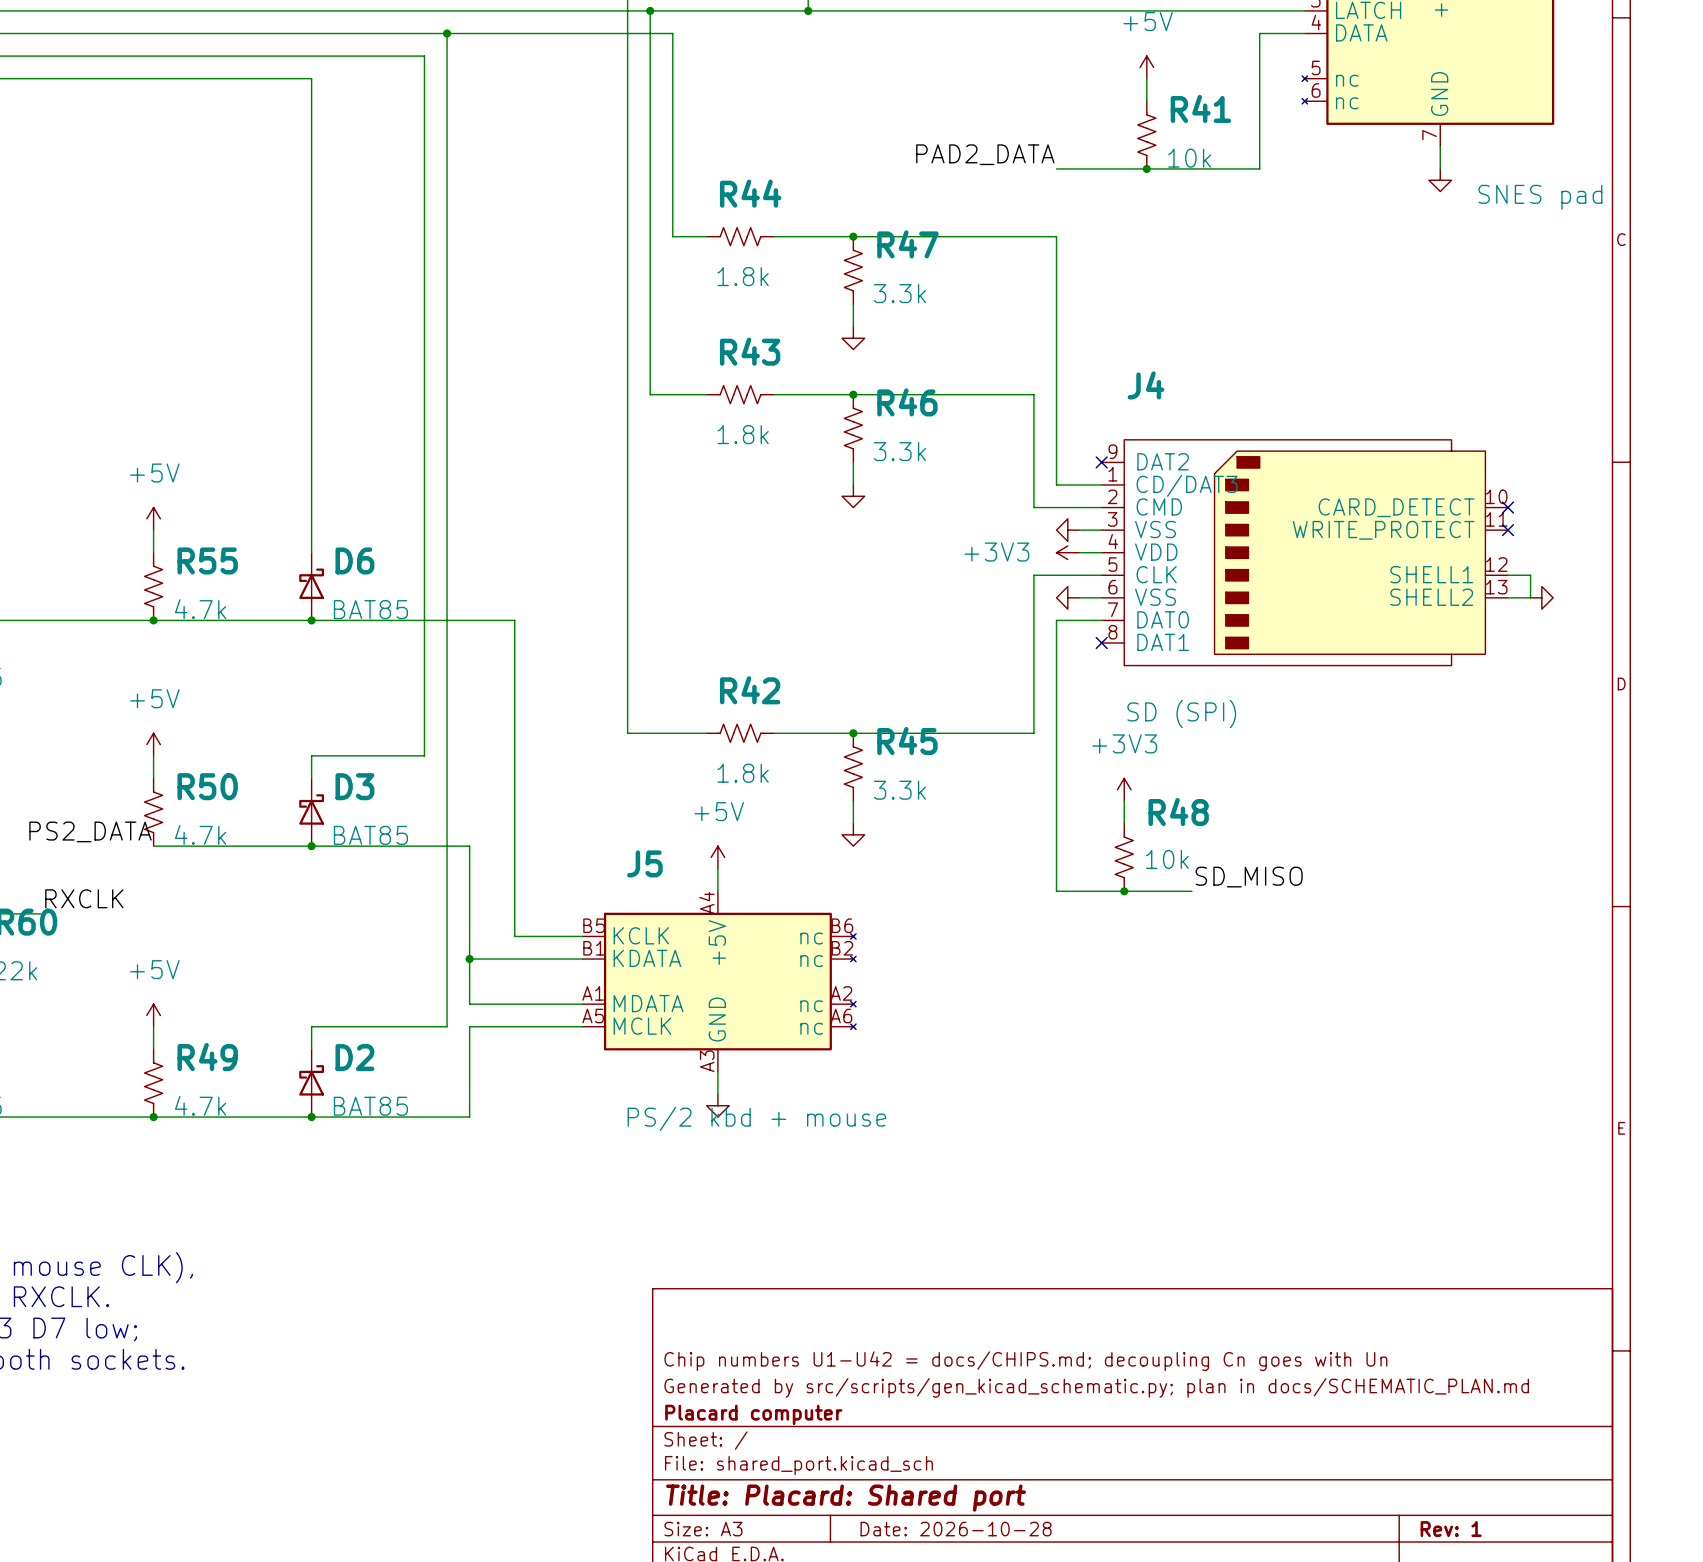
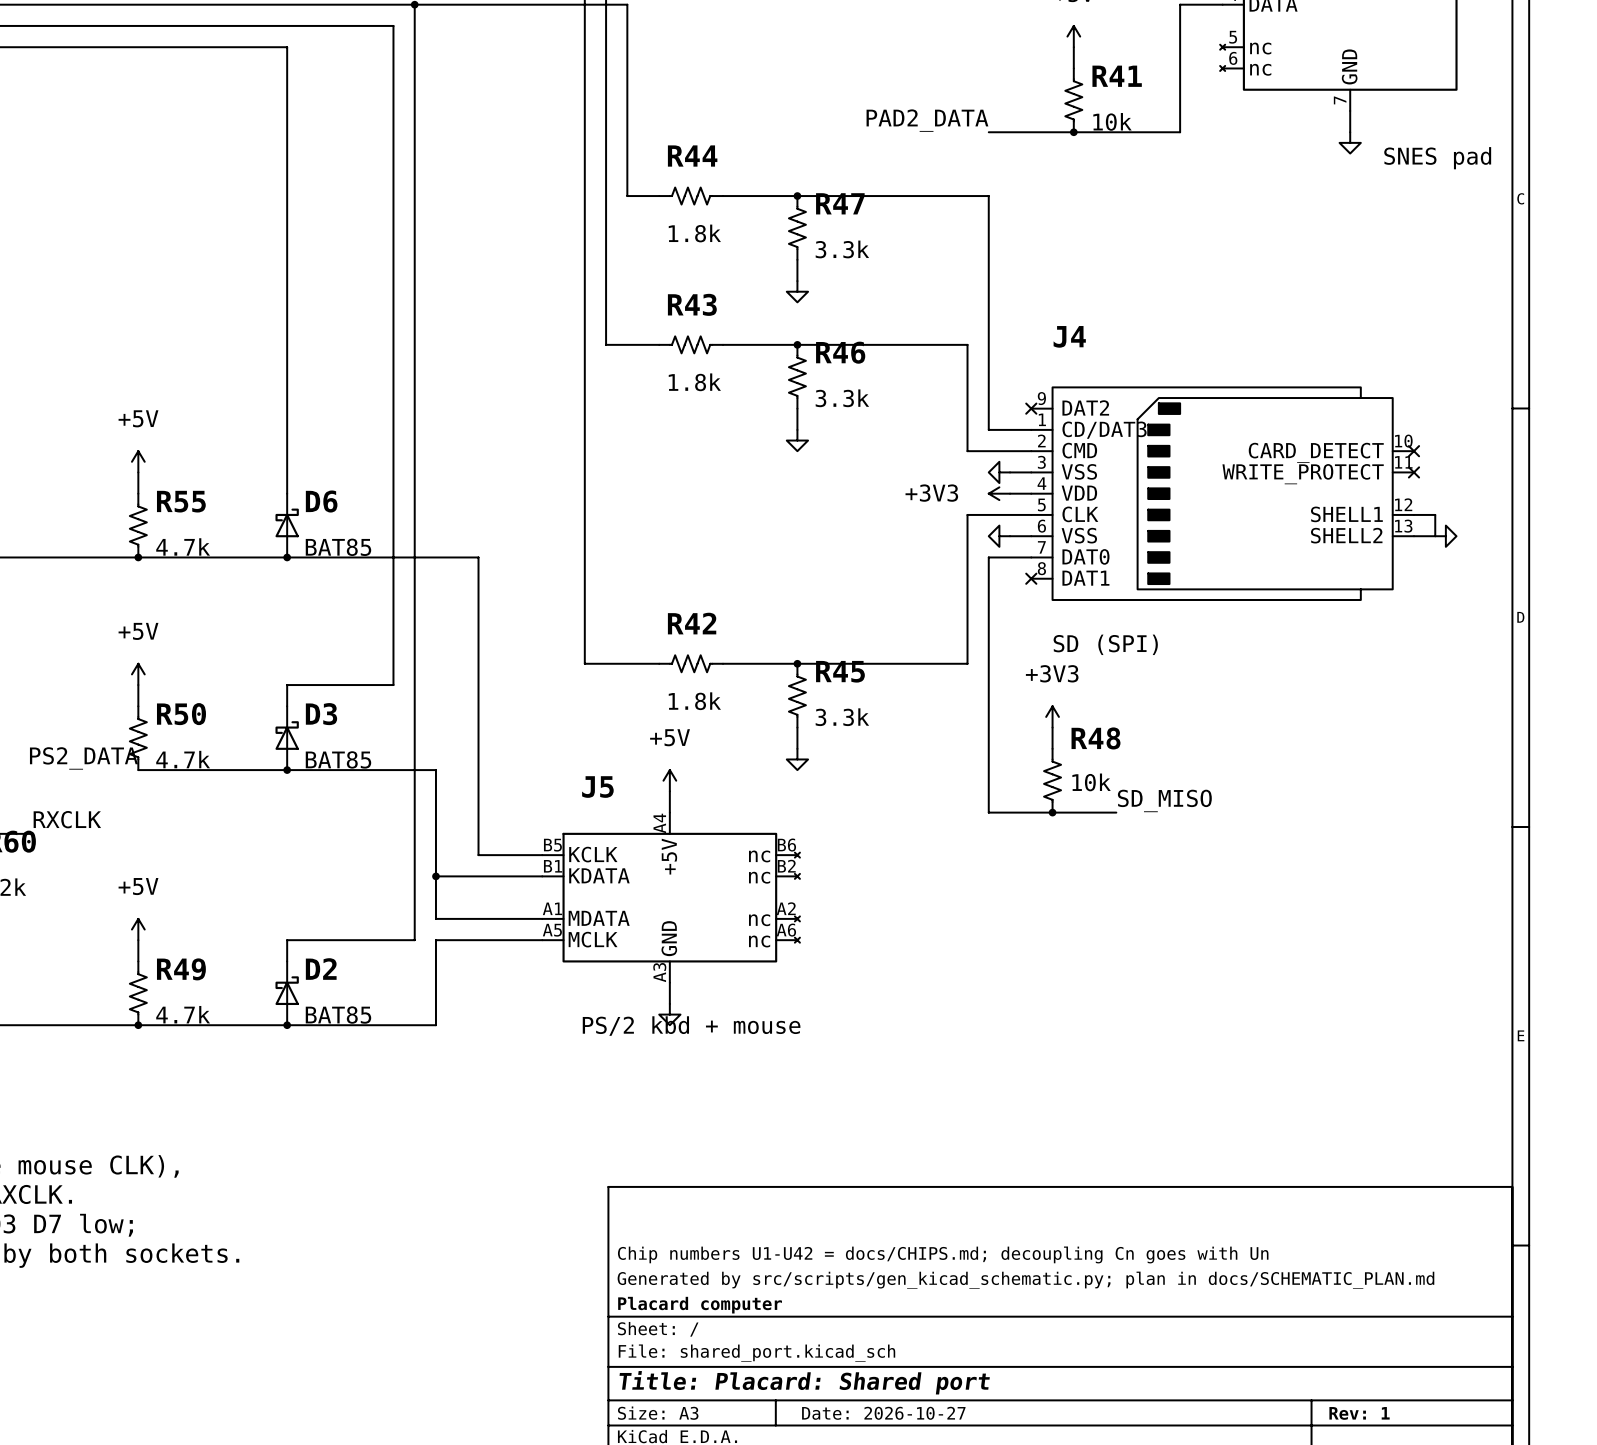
title block: Date: 2026-10-28 (956, 1529) -> Date: 2026-10-27 (883, 1413)

